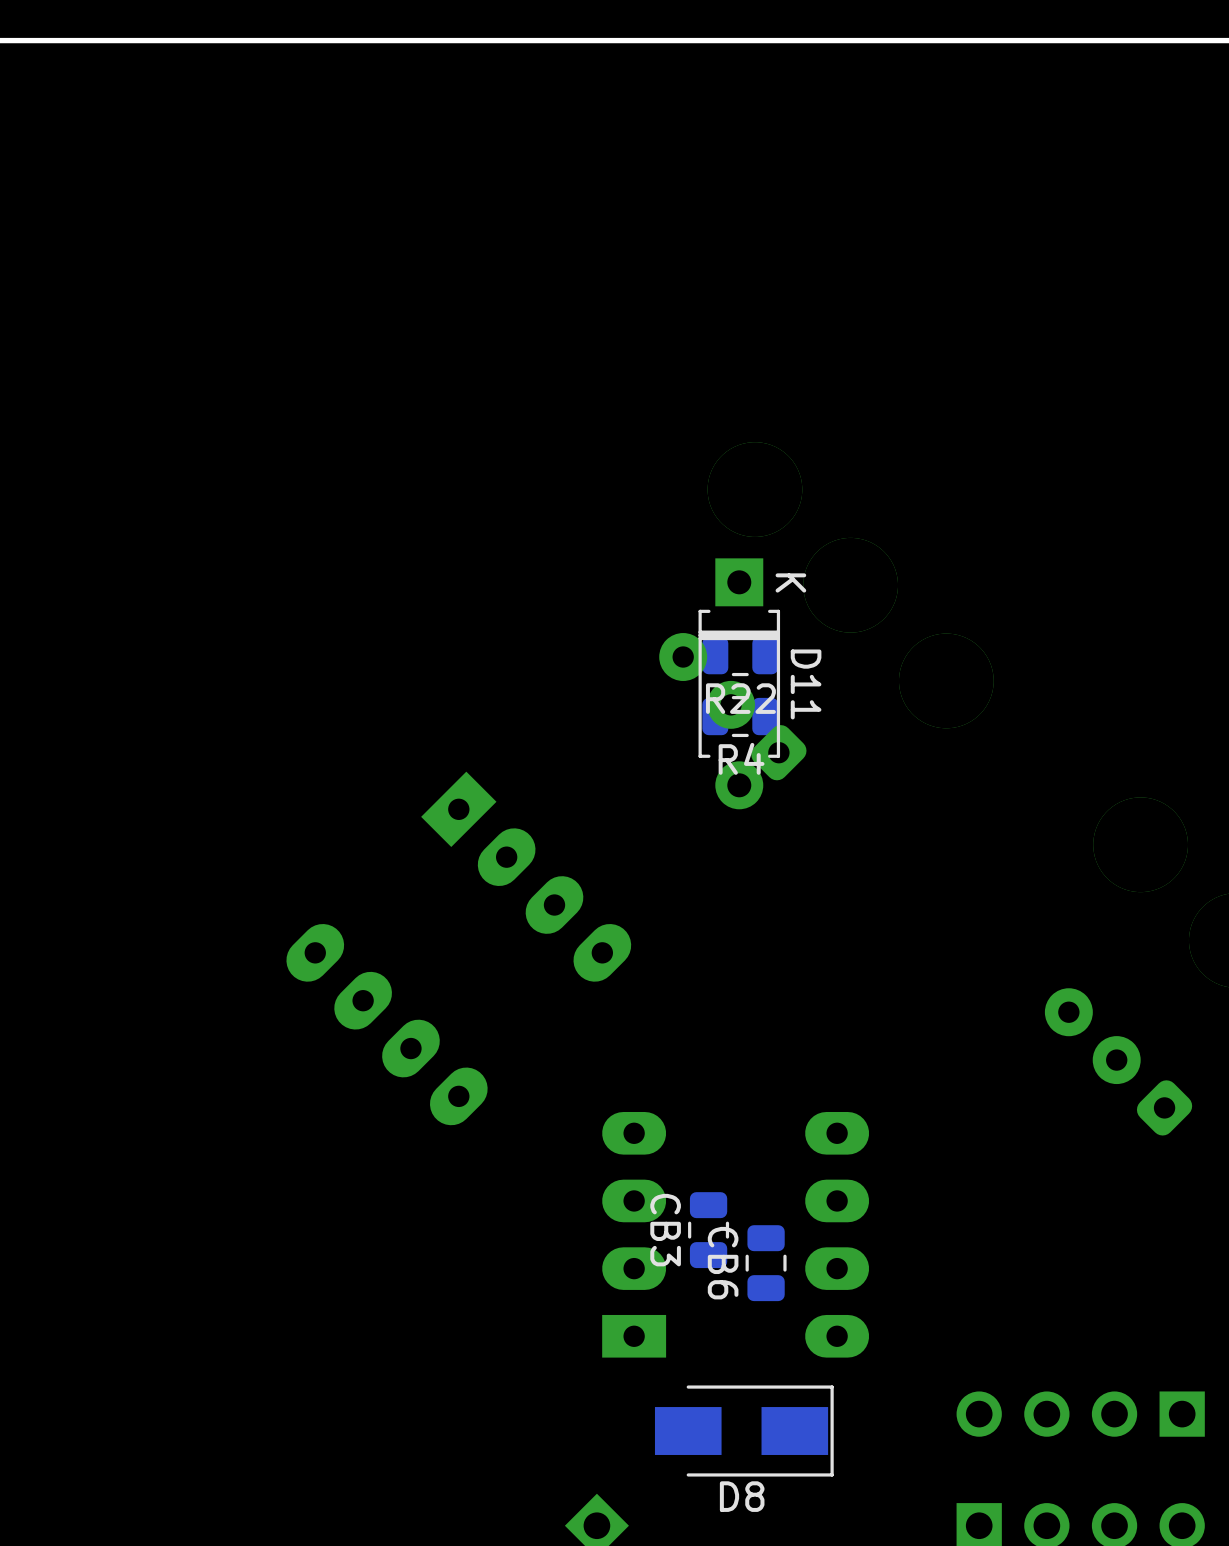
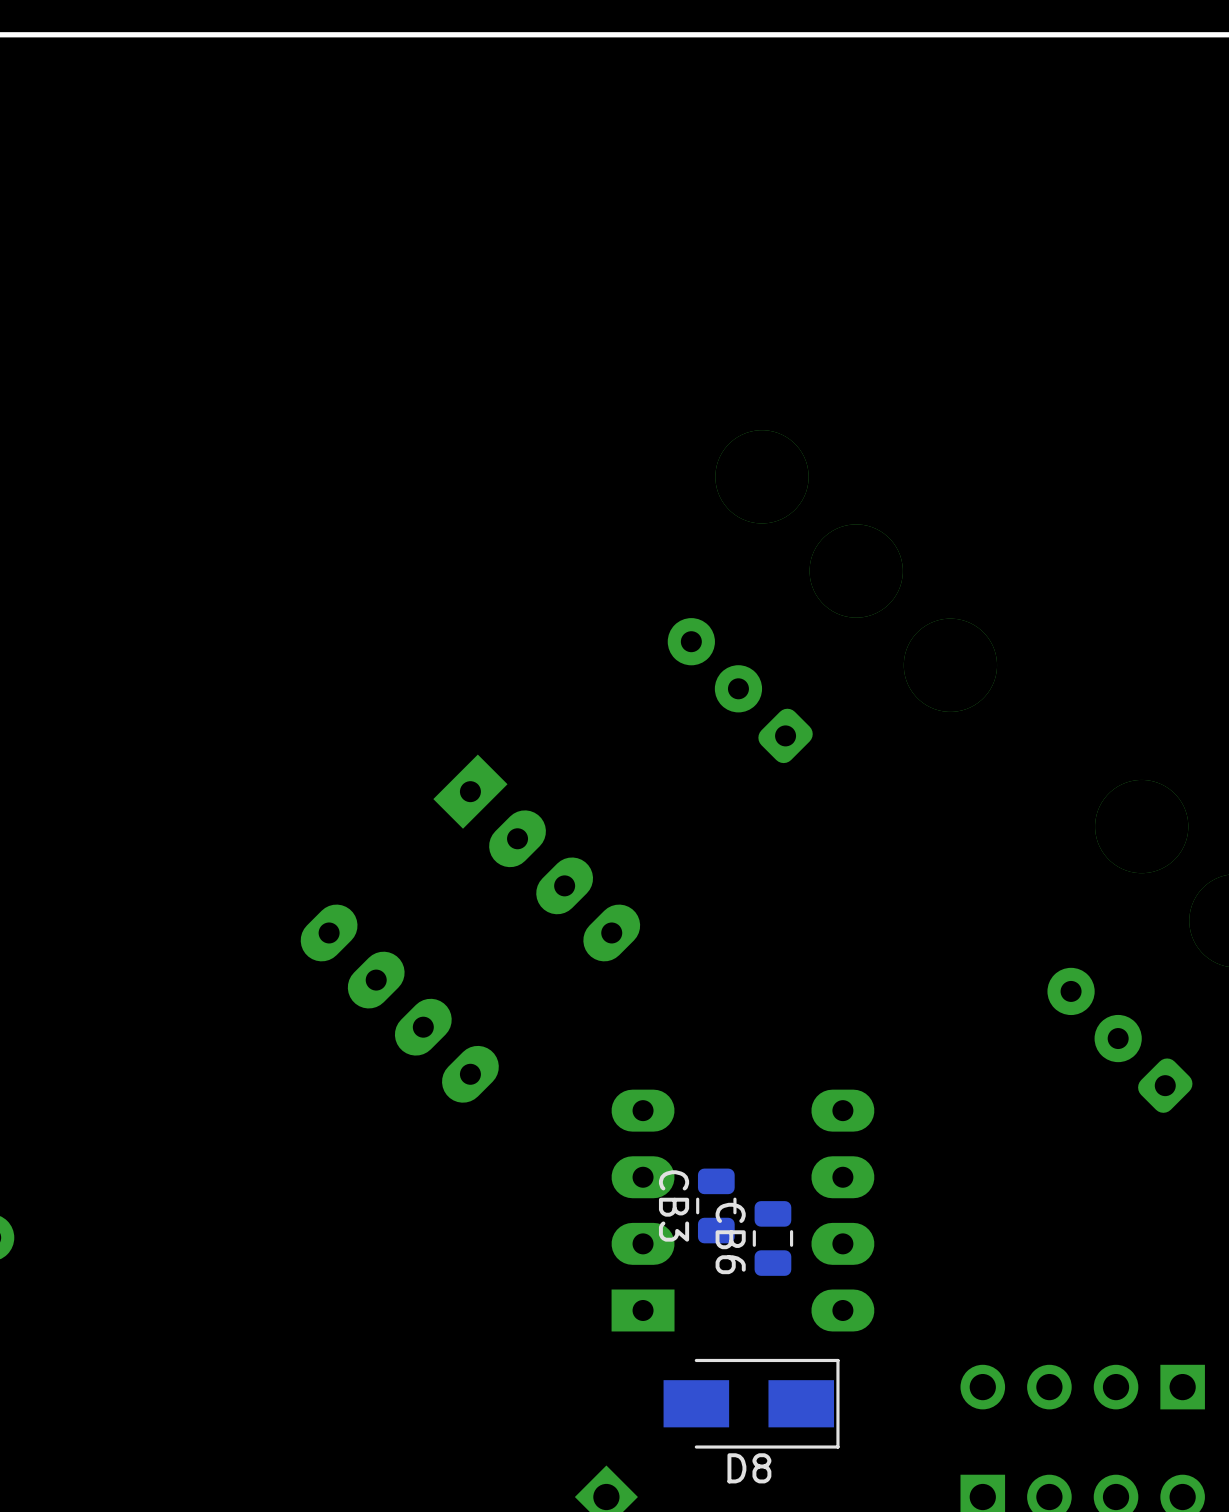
R22: (740, 655) -> none
D11: (739, 683) -> none
R4: (740, 716) -> none

